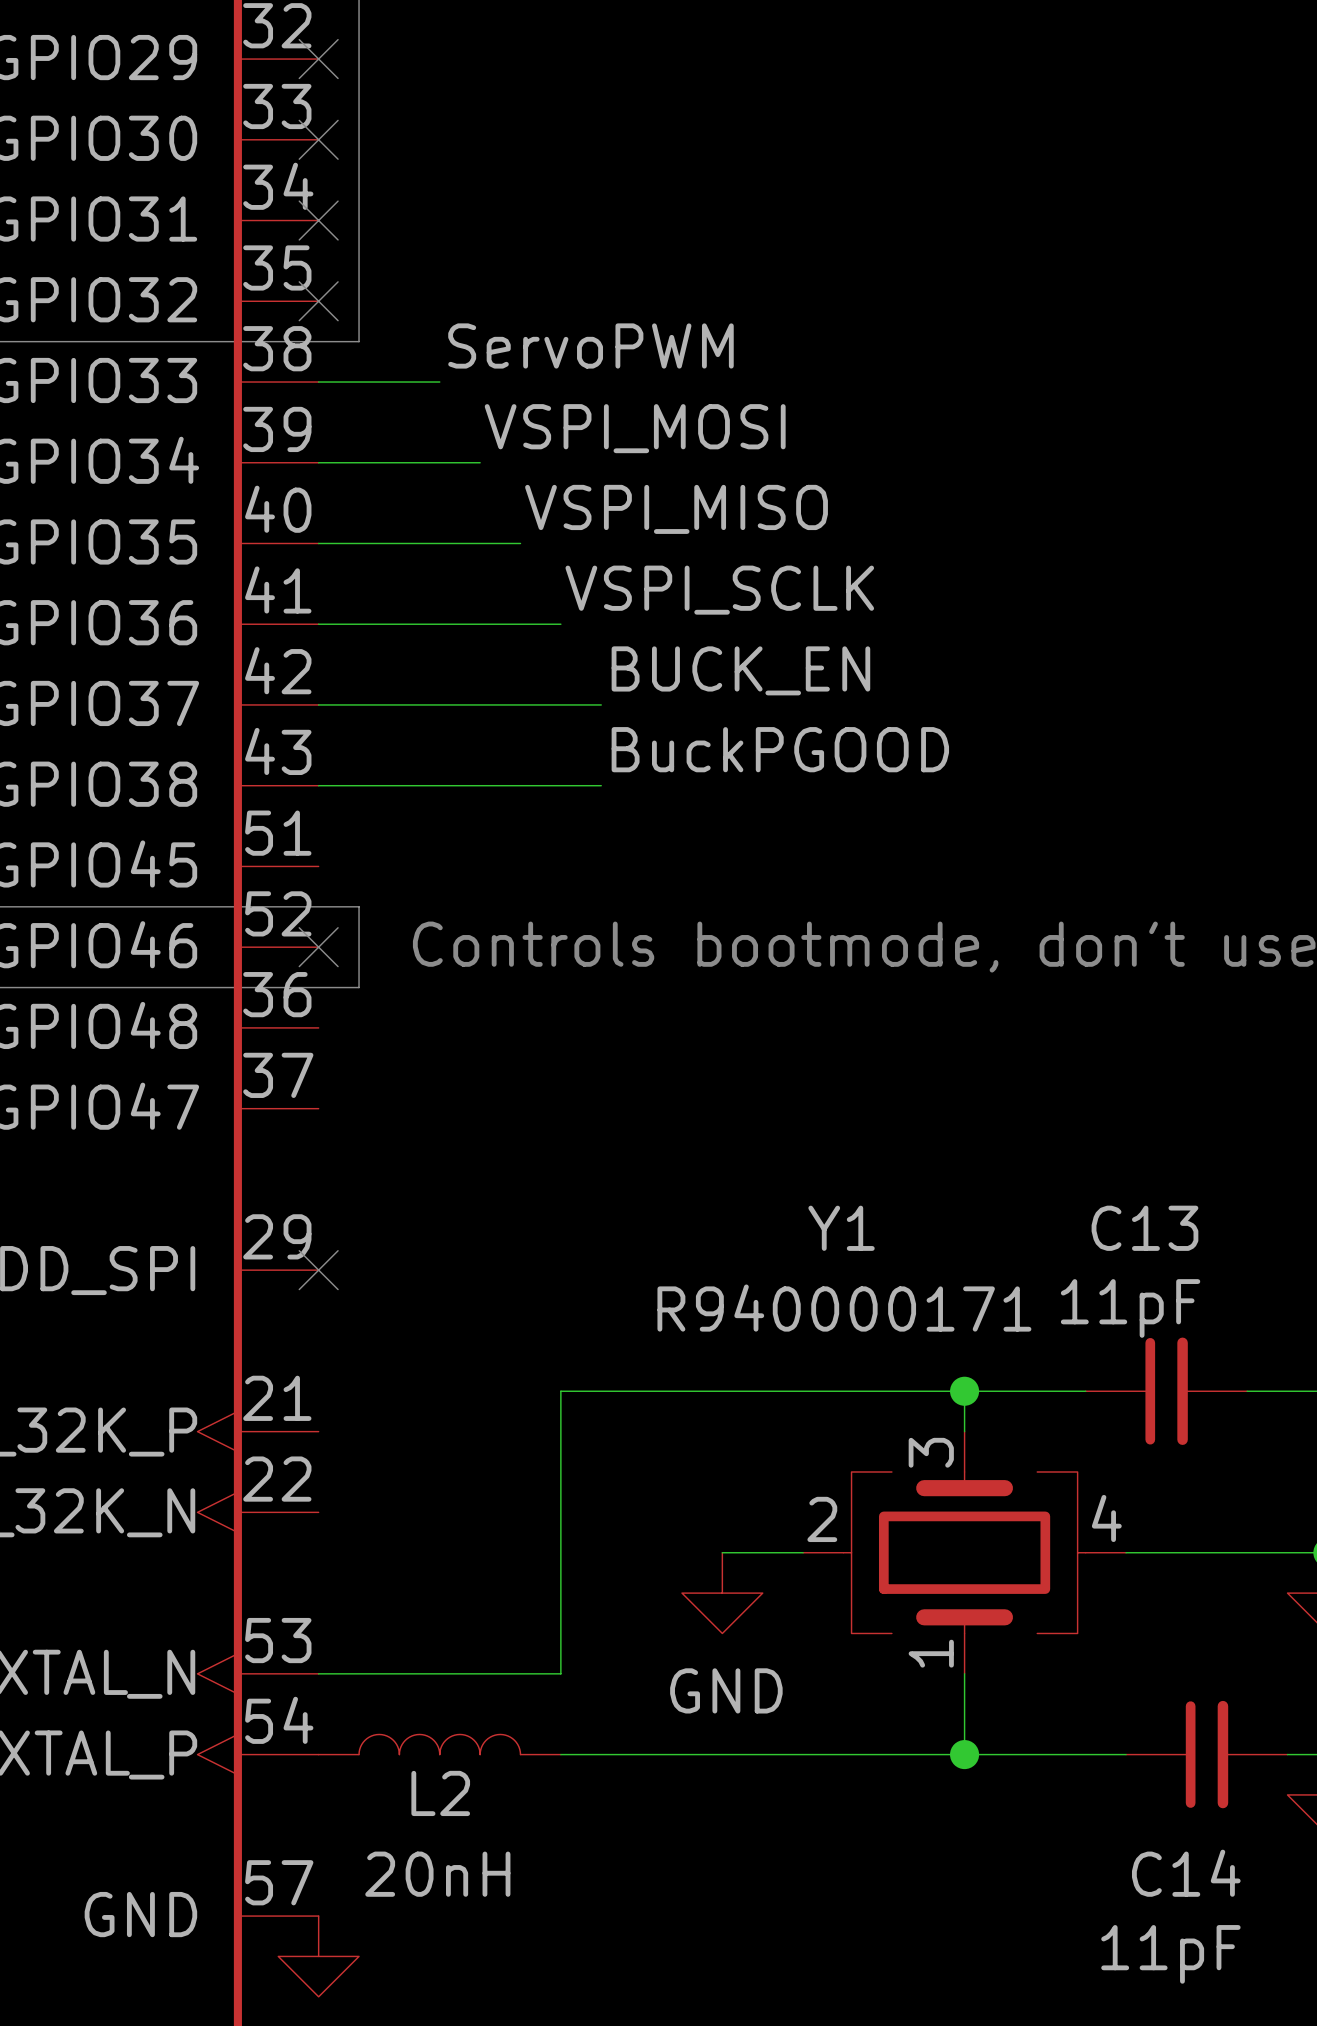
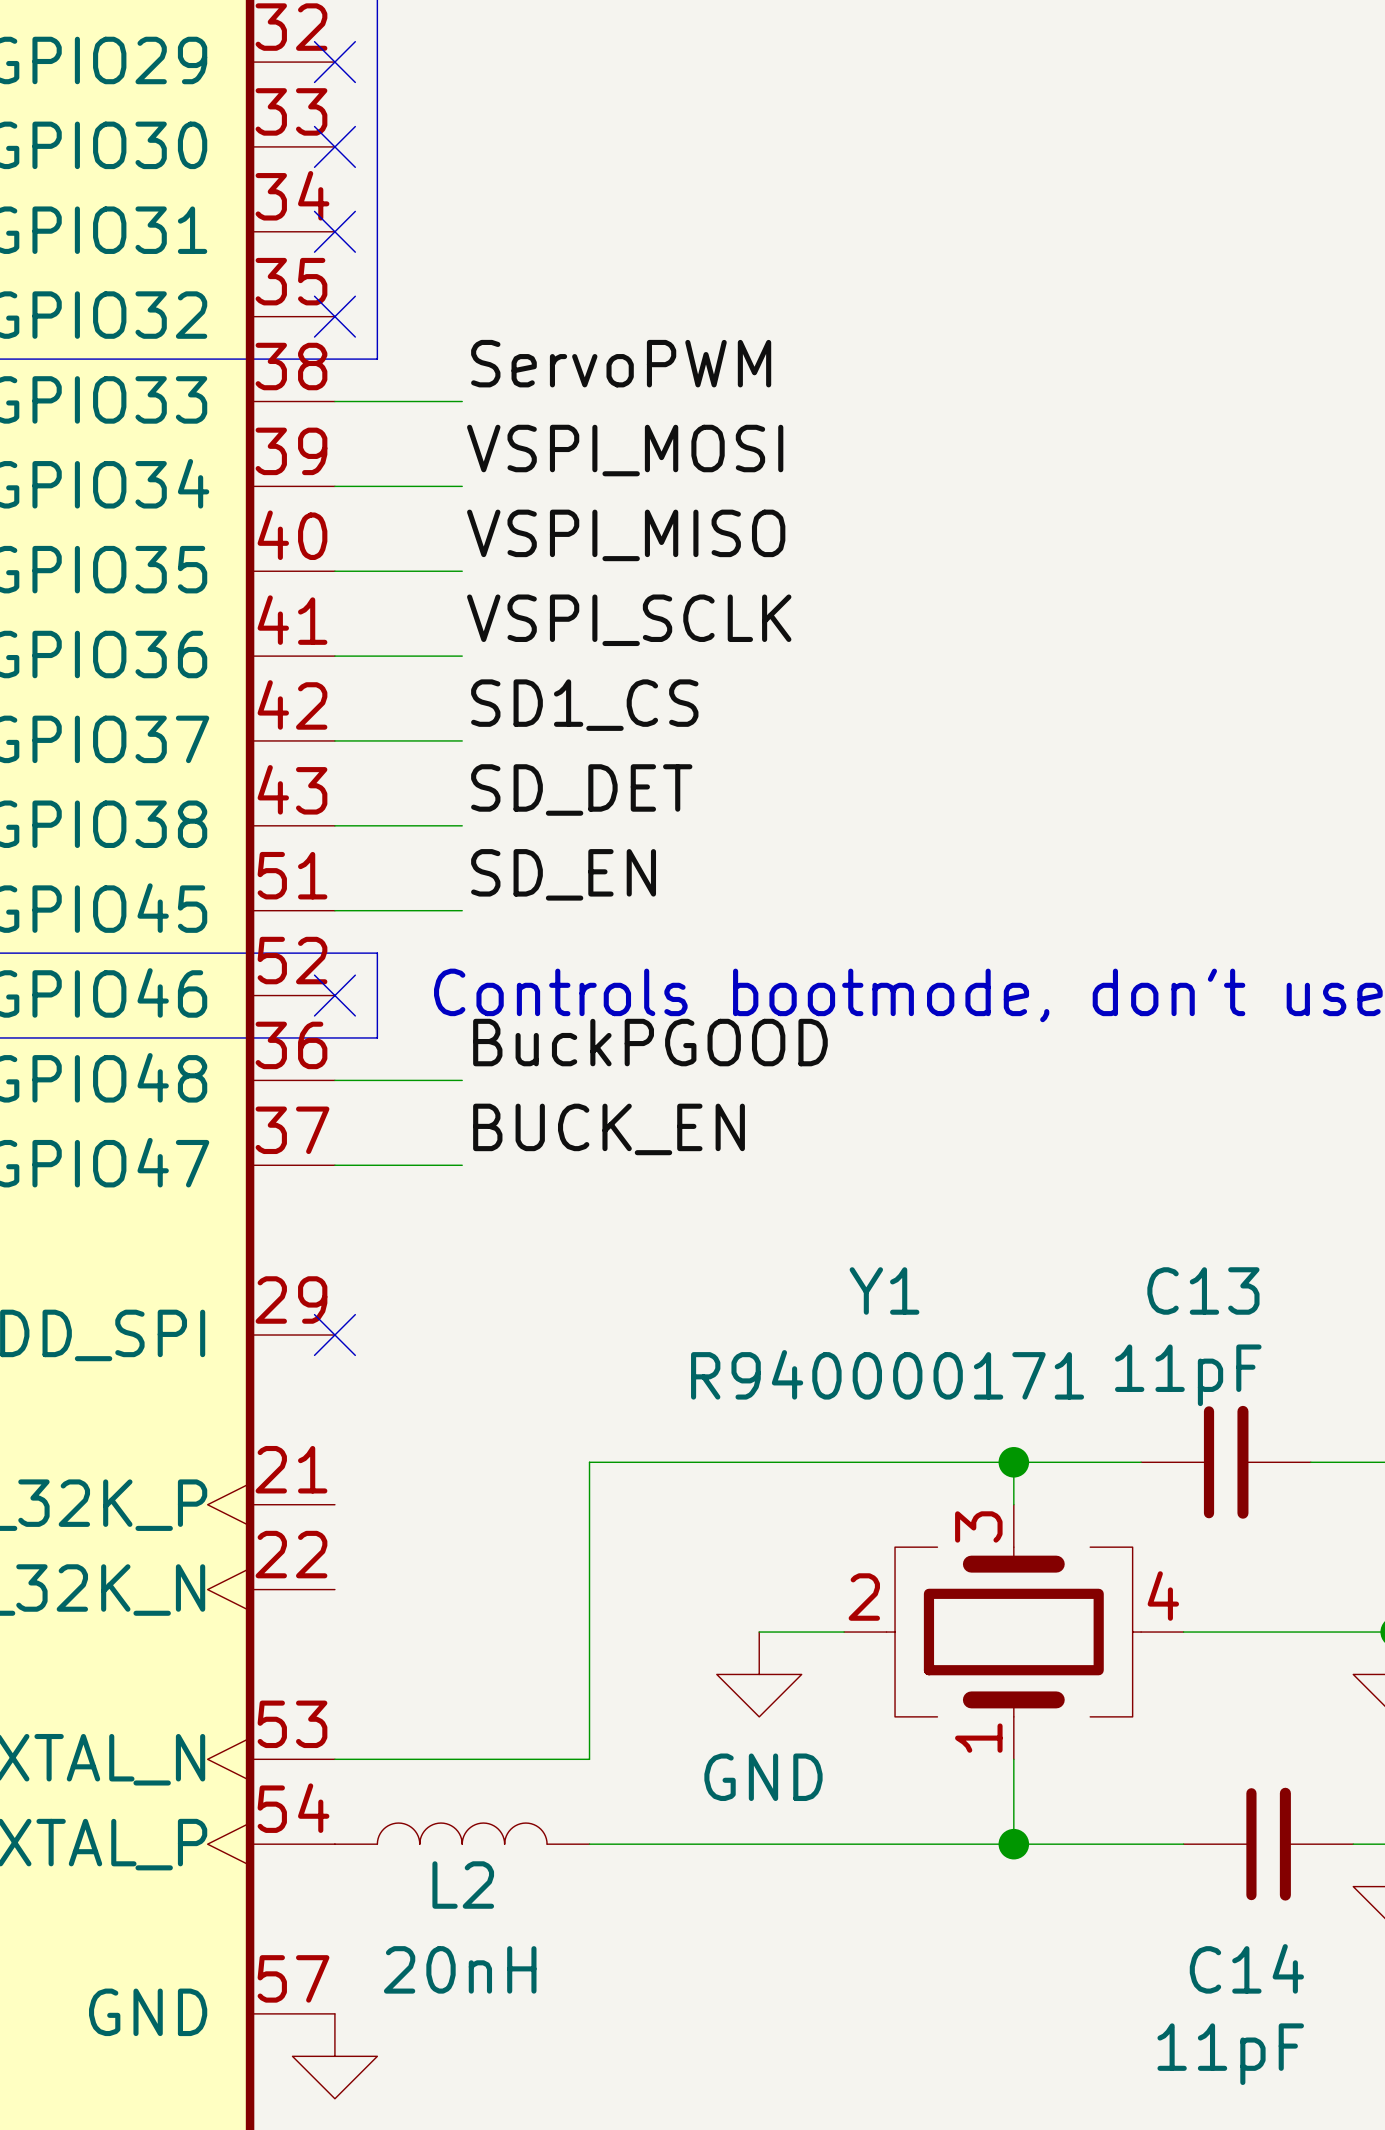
label position: VSPI_MOSI (635, 428) -> VSPI_MOSI (625, 450)
wire: (439, 462) (480, 462) -> none
label position: VSPI_MISO (676, 509) -> VSPI_MISO (626, 535)
wire: (439, 543) (520, 543) -> none
label position: VSPI_SCLK (719, 590) -> VSPI_SCLK (629, 620)
wire: (439, 624) (560, 624) -> (334, 910) (462, 910)
label: none -> SD1_CS (584, 705)
label position: BUCK_EN (740, 670) -> BUCK_EN (609, 1129)
wire: (439, 704) (601, 704) -> none
label position: BuckPGOOD (780, 749) -> BuckPGOOD (650, 1042)
label: none -> SD_DET (581, 789)
wire: (439, 785) (601, 785) -> none
label: none -> SD_EN (563, 874)
wire: none -> (334, 1080) (462, 1080)
wire: none -> (334, 1165) (462, 1165)

